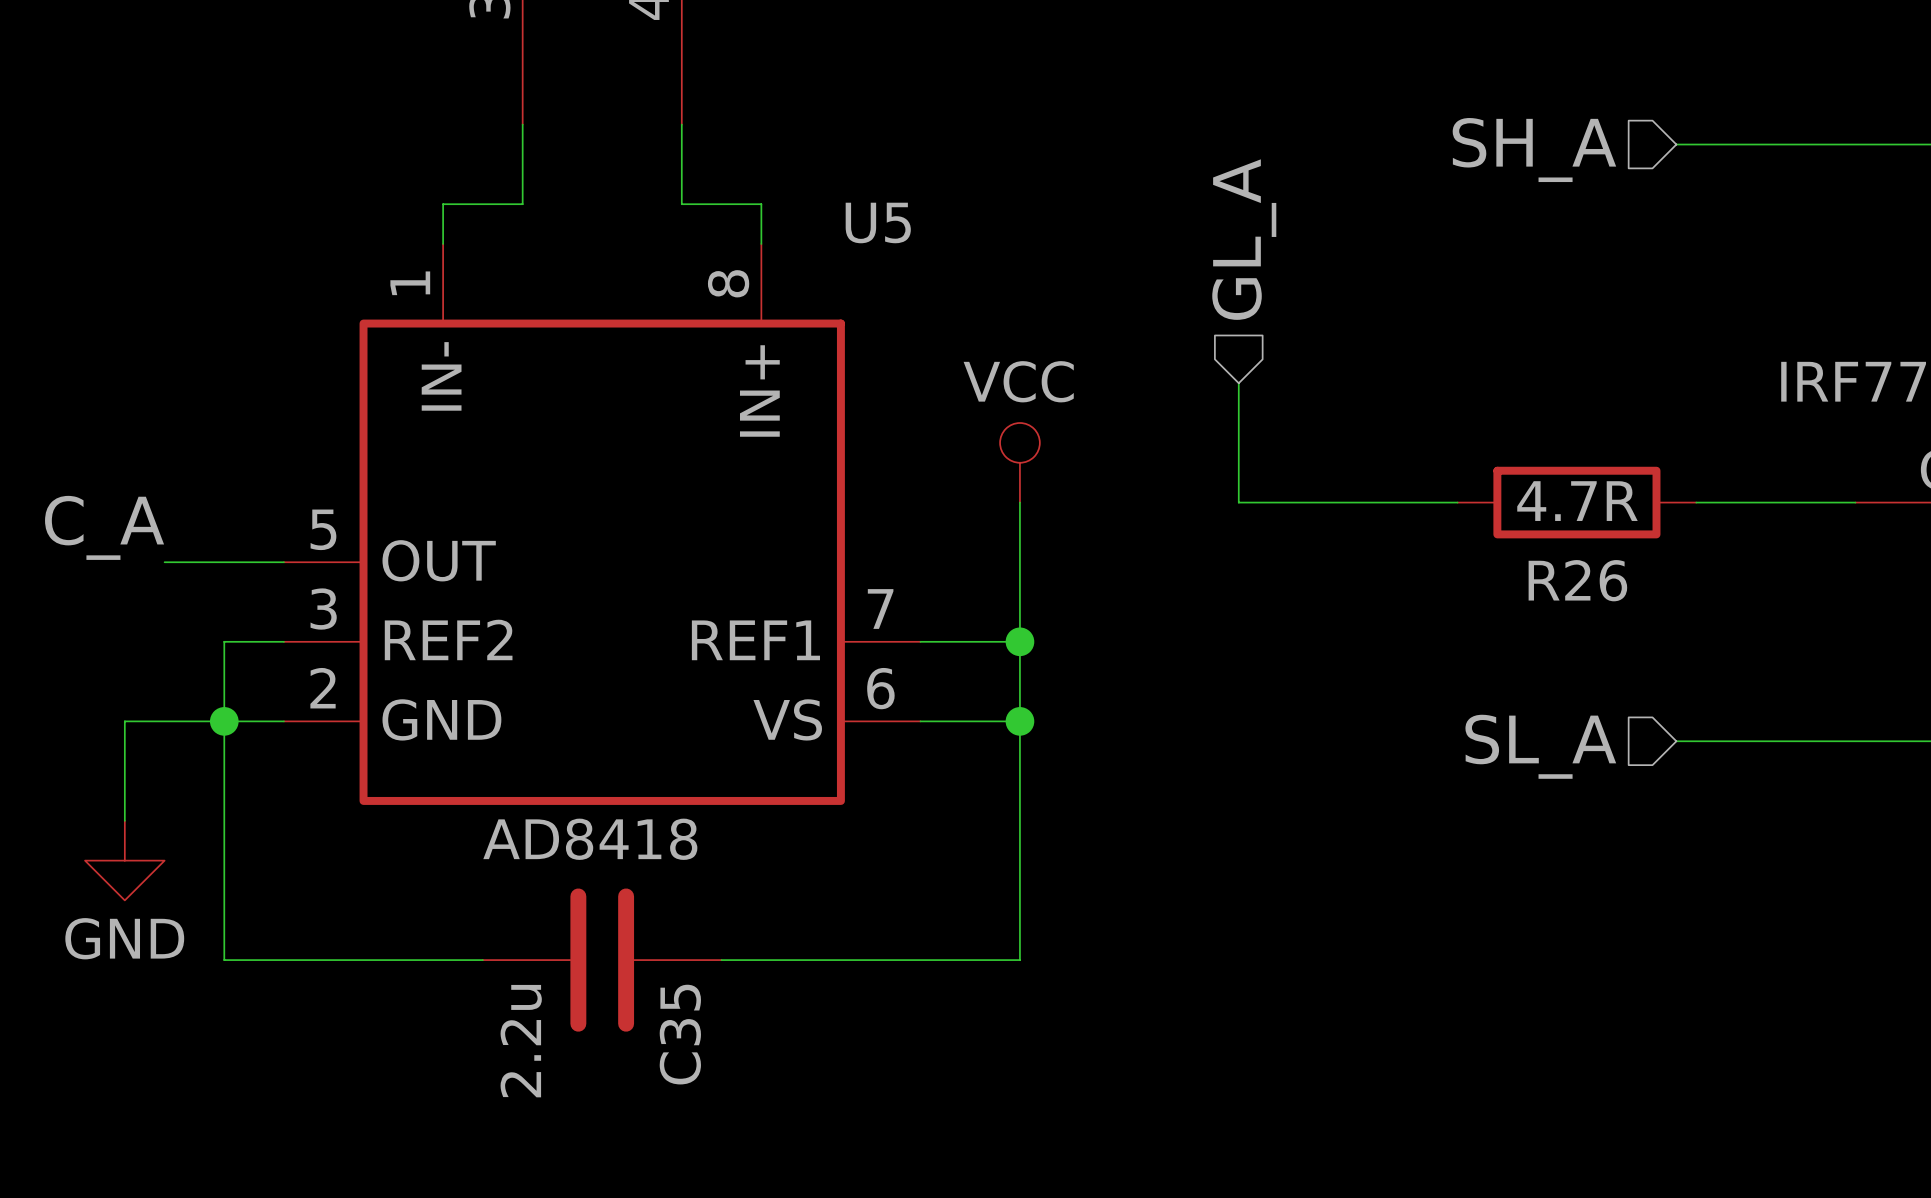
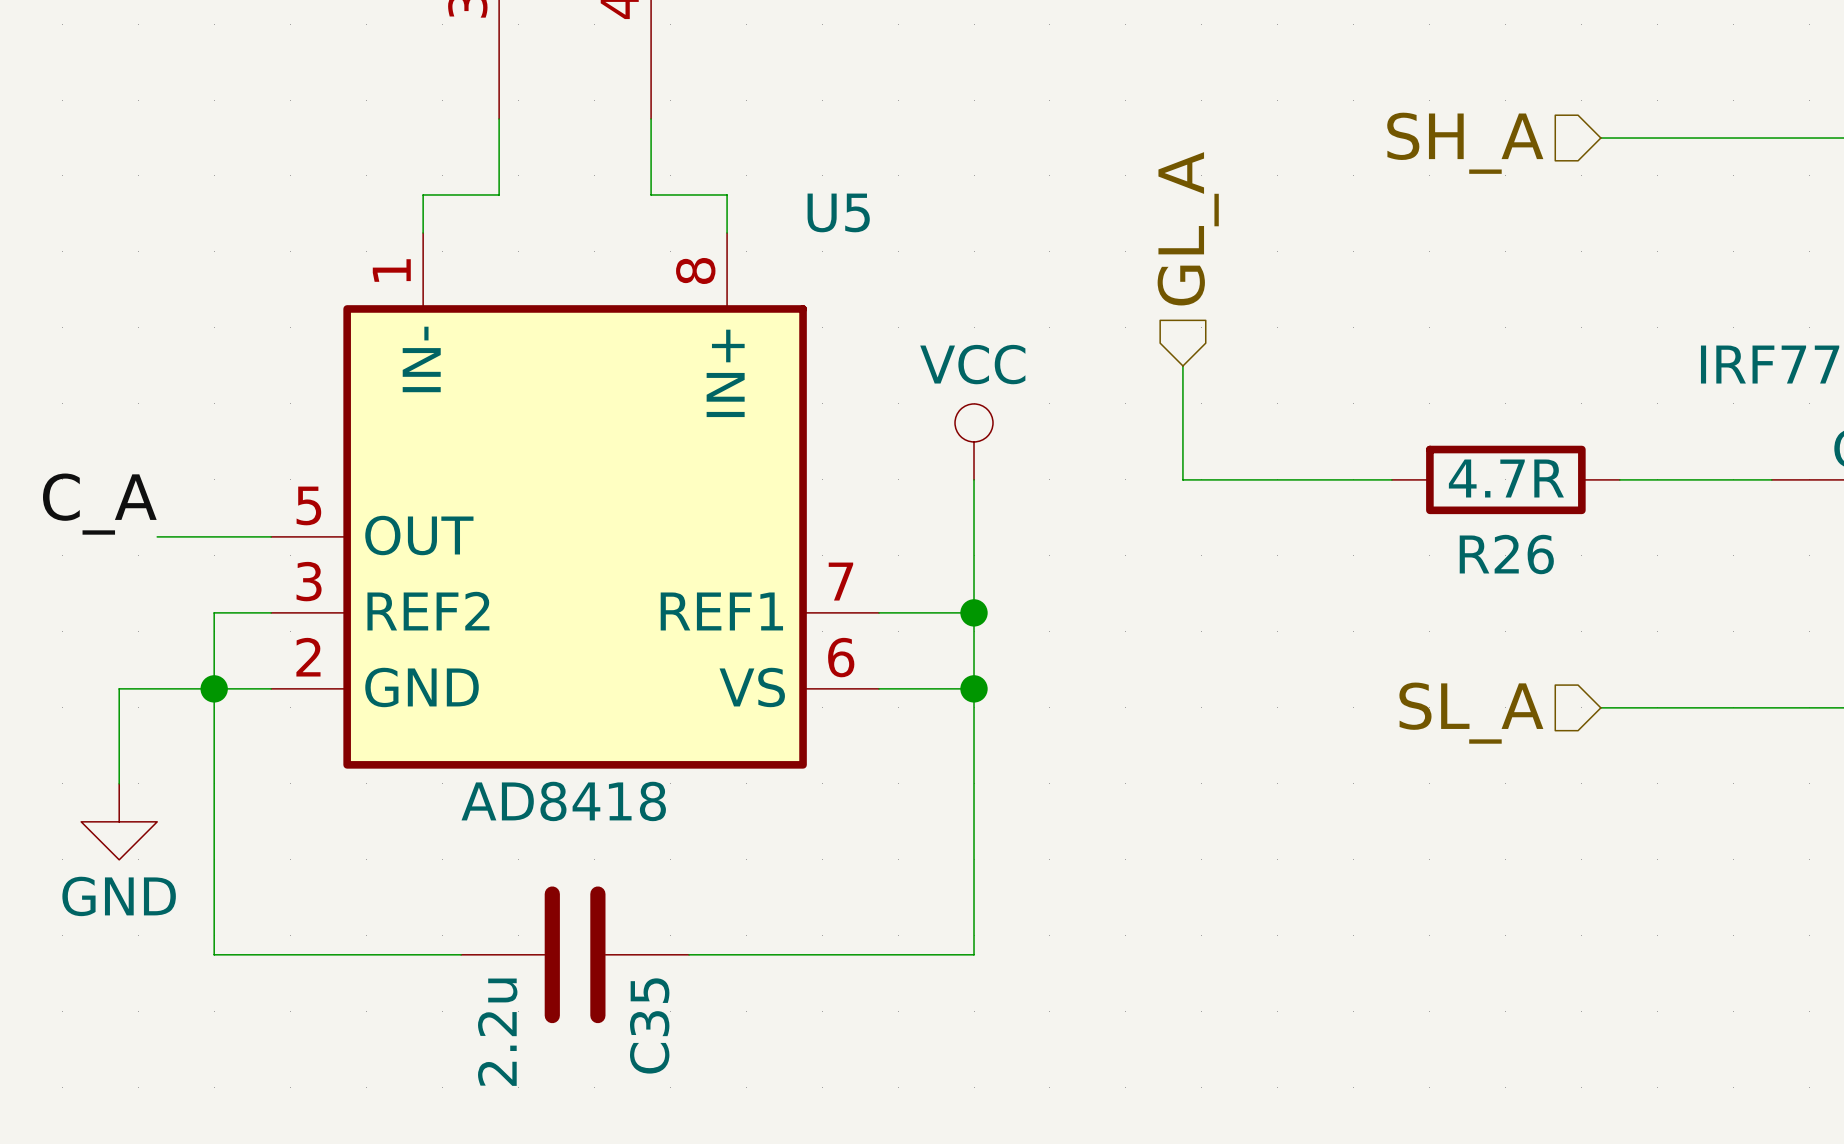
wire: (224, 960) (482, 960) -> (214, 916) (214, 954) (461, 954)
C35 position: (602, 960) -> (575, 954)
wire: (721, 960) (1019, 960) -> (689, 954) (974, 954) (974, 916)

